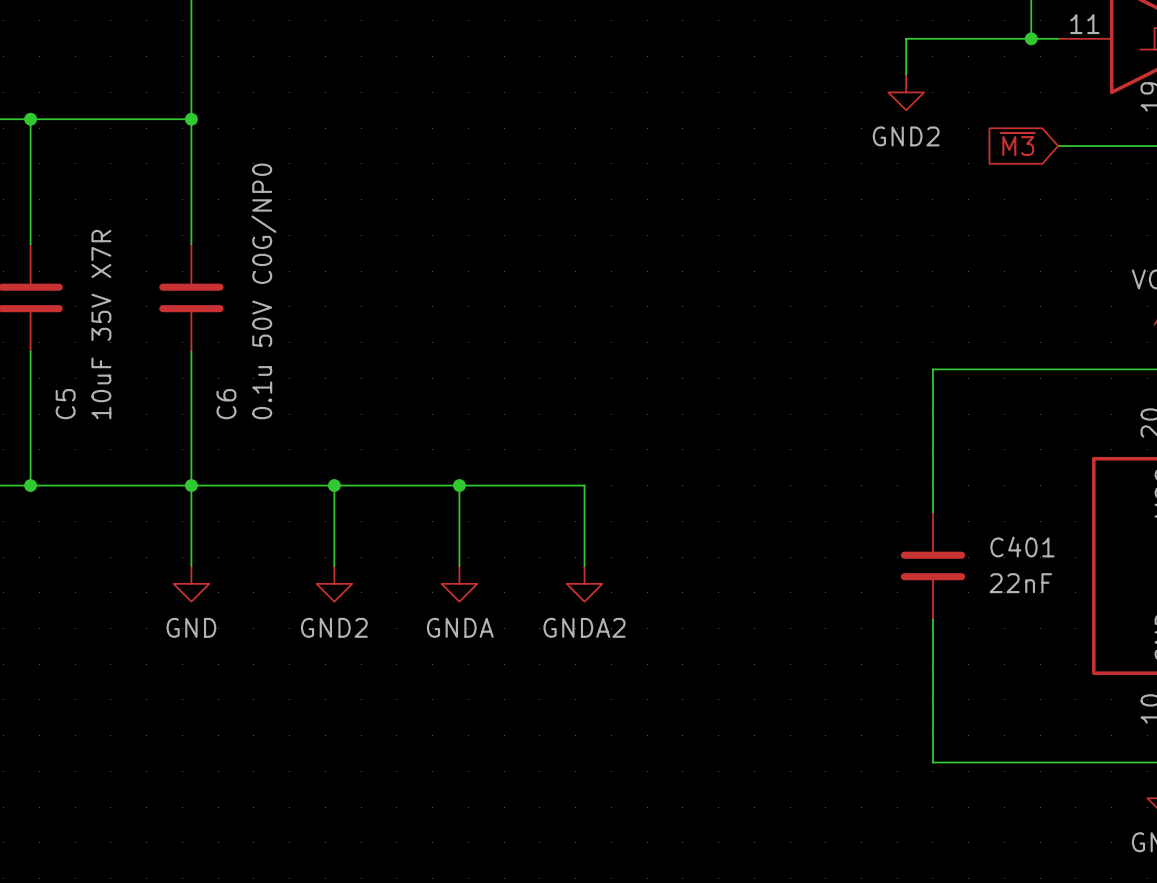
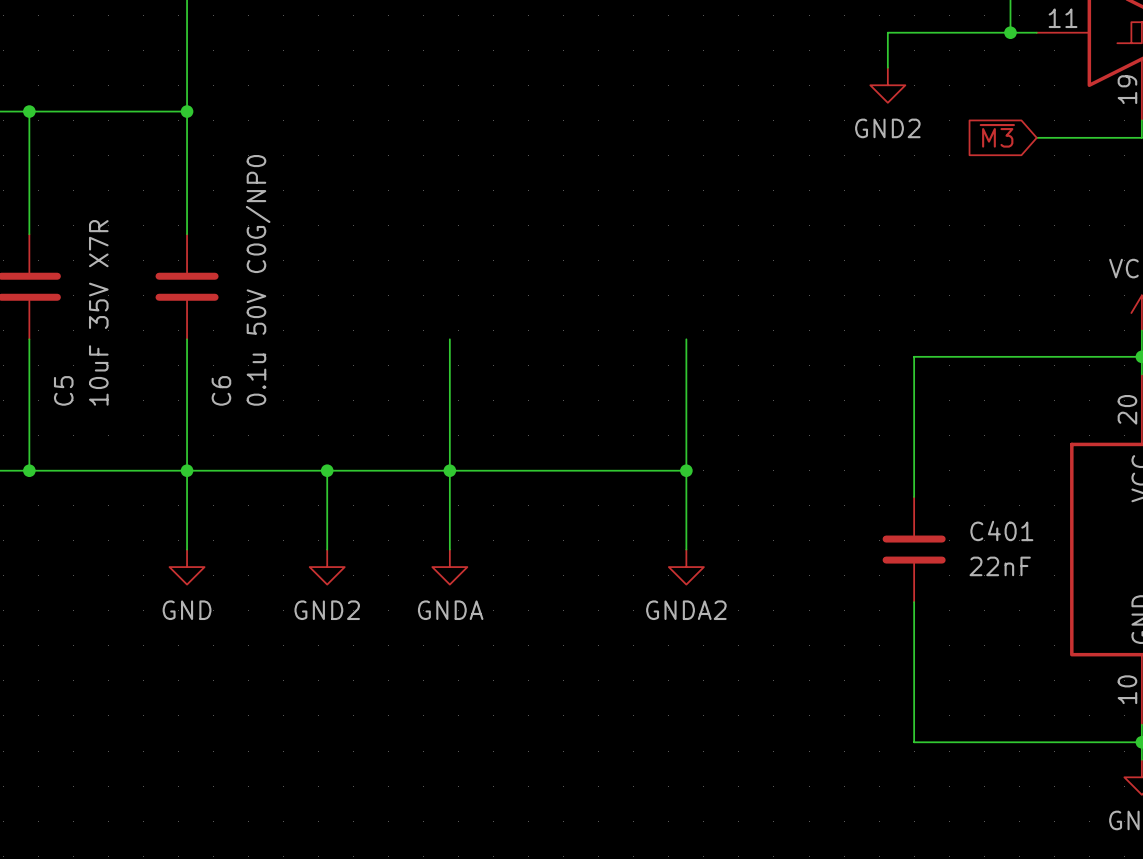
wire: none -> (449, 339) (449, 470)
wire: none -> (686, 339) (686, 549)
wire: (584, 485) (584, 565) -> (572, 470) (686, 470)
junction: none -> (686, 470)
power symbol position: GNDA2 (584, 583) -> GNDA2 (686, 567)

